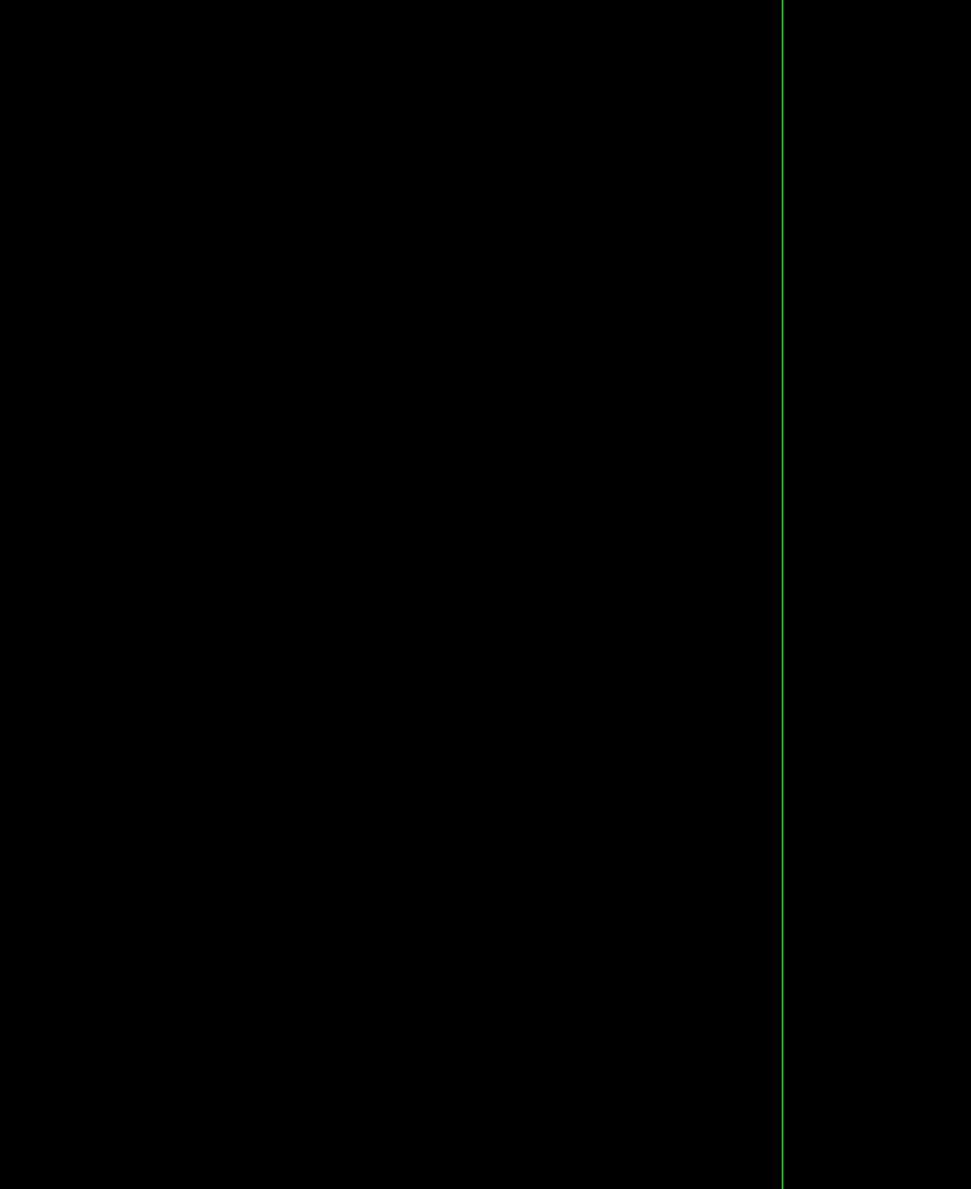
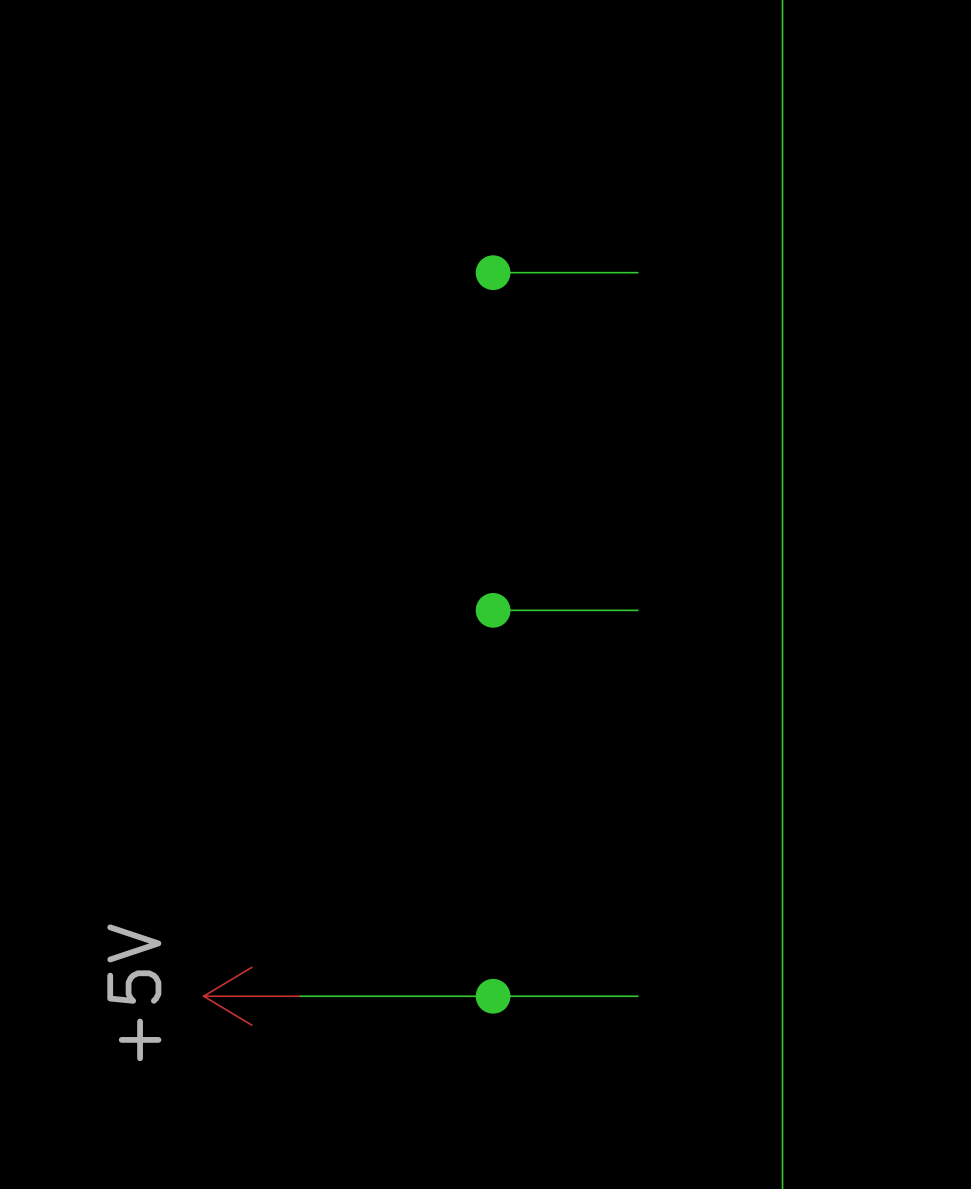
wire: none -> (493, 272) (637, 272)
junction: none -> (493, 272)
wire: none -> (493, 610) (637, 610)
junction: none -> (493, 610)
power symbol: none -> +5V (251, 996)
wire: none -> (300, 996) (637, 996)
junction: none -> (493, 996)

